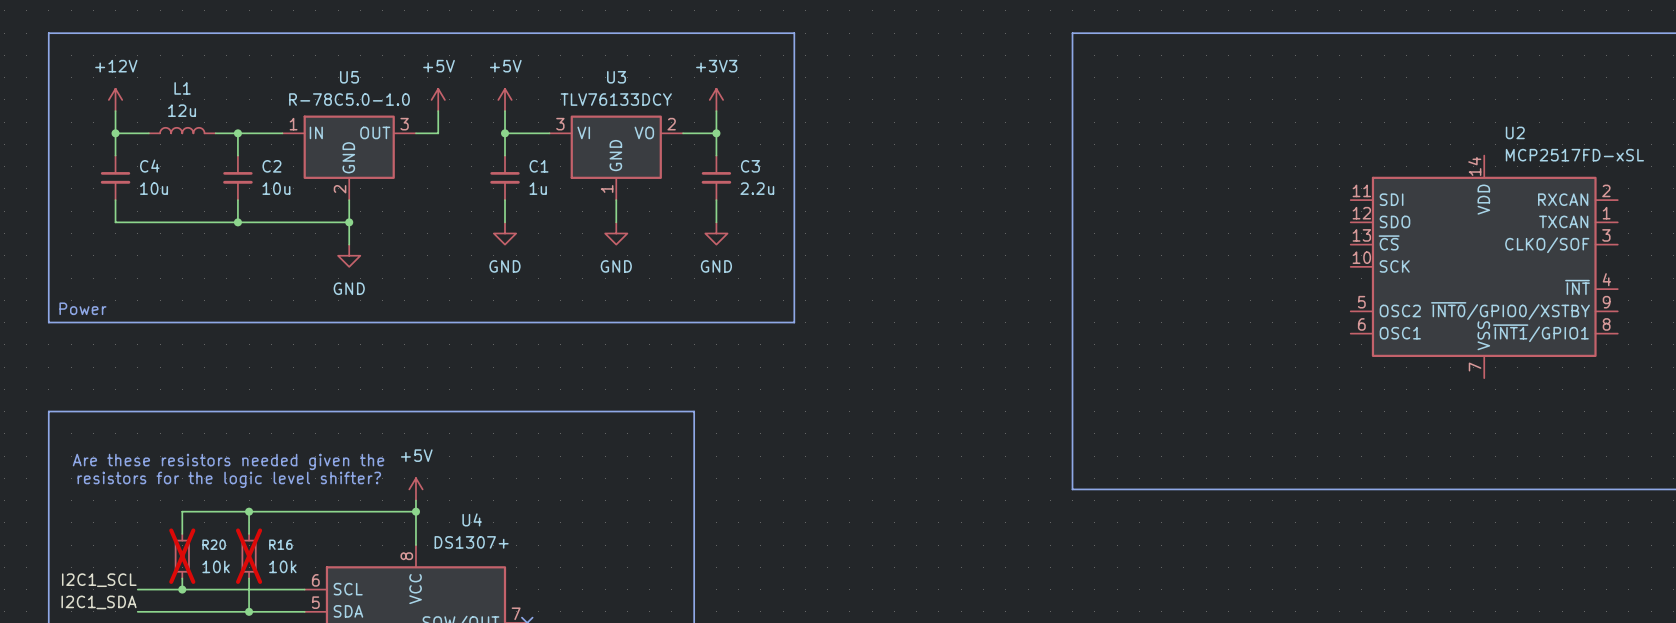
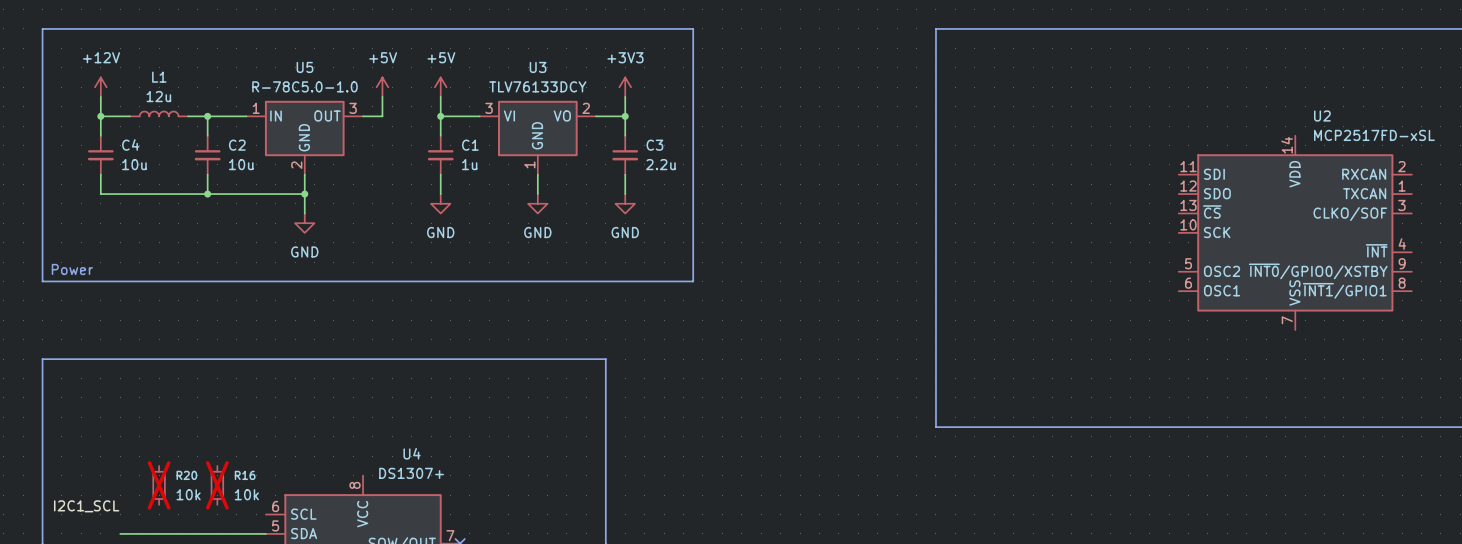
text: Are these resistors needed given the (228, 461) -> none
text: resistors for the logic level shifter? (229, 479) -> none
power symbol: +5V (415, 489) -> none
wire: (415, 500) (415, 545) -> none
wire: (249, 511) (249, 533) -> none
junction: (249, 511) -> none
wire: (415, 511) (182, 511) (182, 533) -> none
junction: (415, 511) -> none
wire: (182, 578) (182, 589) -> none
wire: (249, 578) (249, 611) -> none
wire: (137, 589) (304, 589) -> none
junction: (182, 589) -> none
label: I2C1_SDA (99, 602) -> none
junction: (249, 611) -> none

